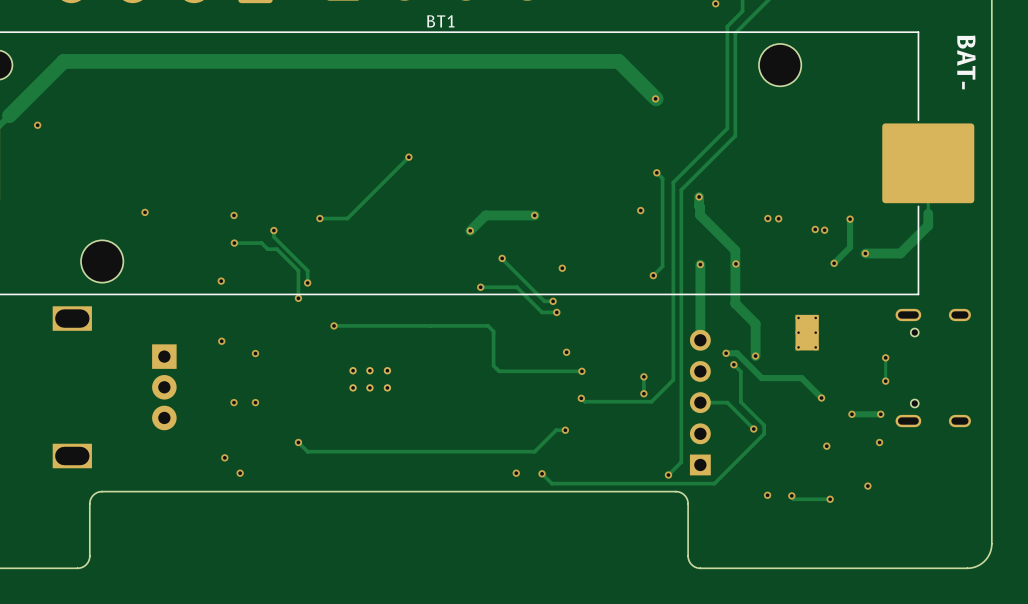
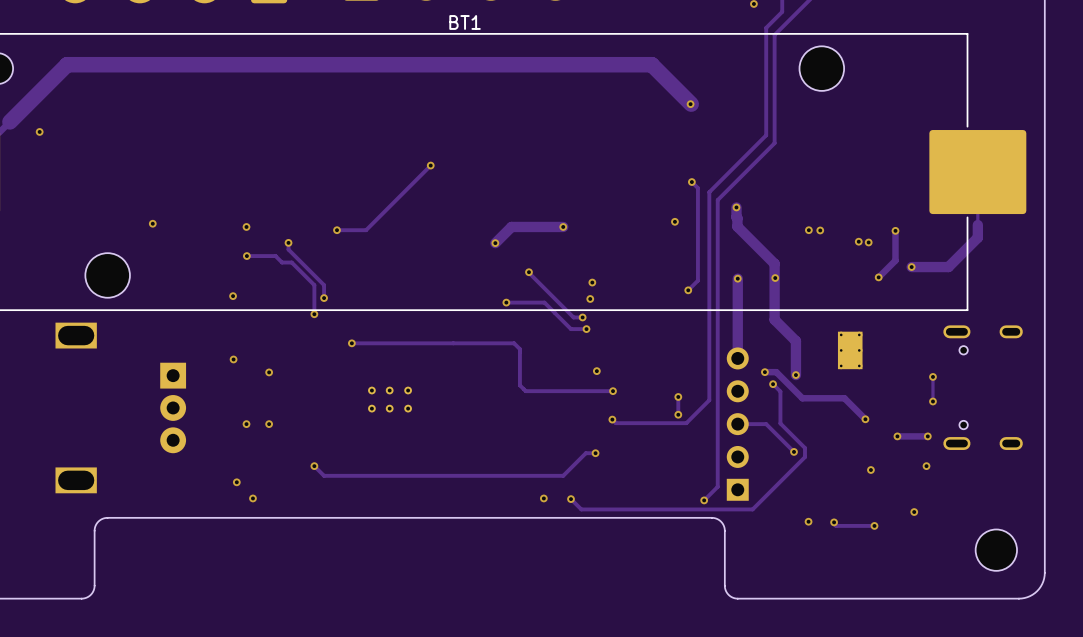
text: BAT- (966, 62) -> none
via: none -> (590, 298)
part: none -> (996, 550)

